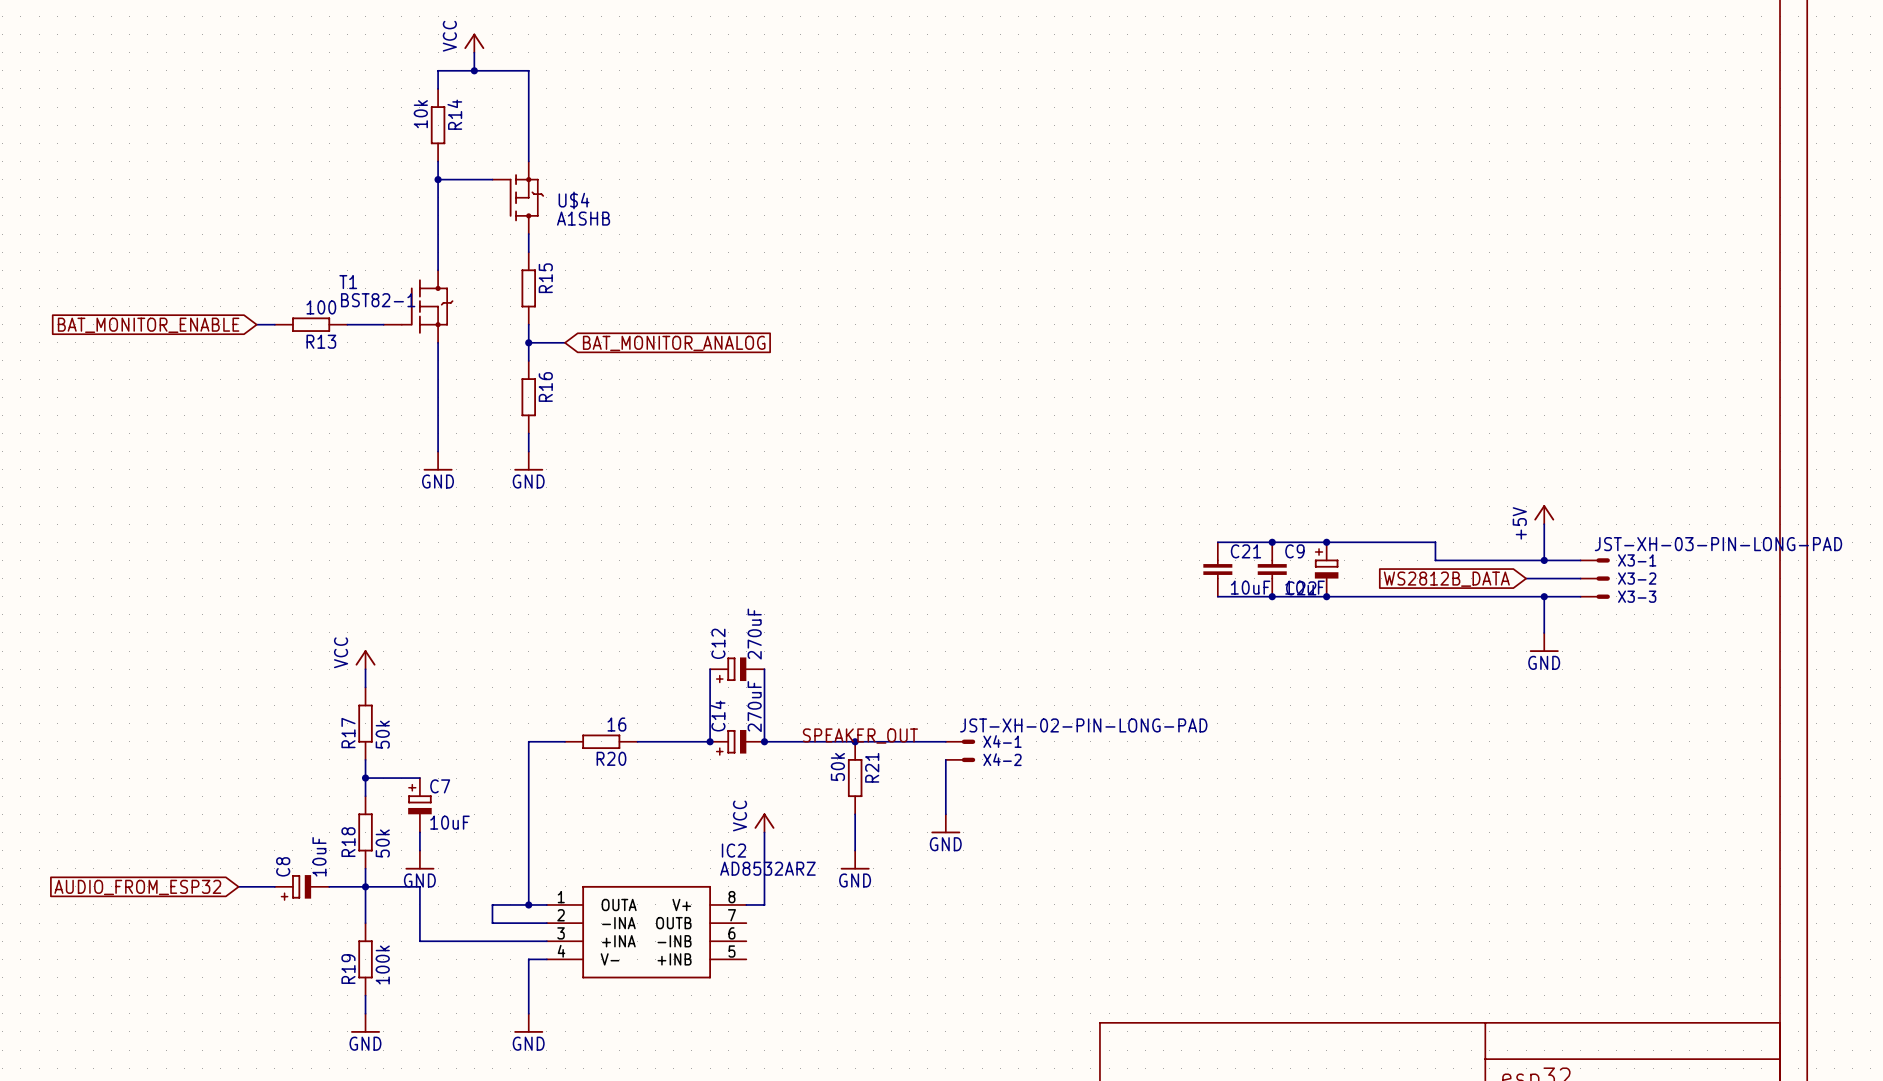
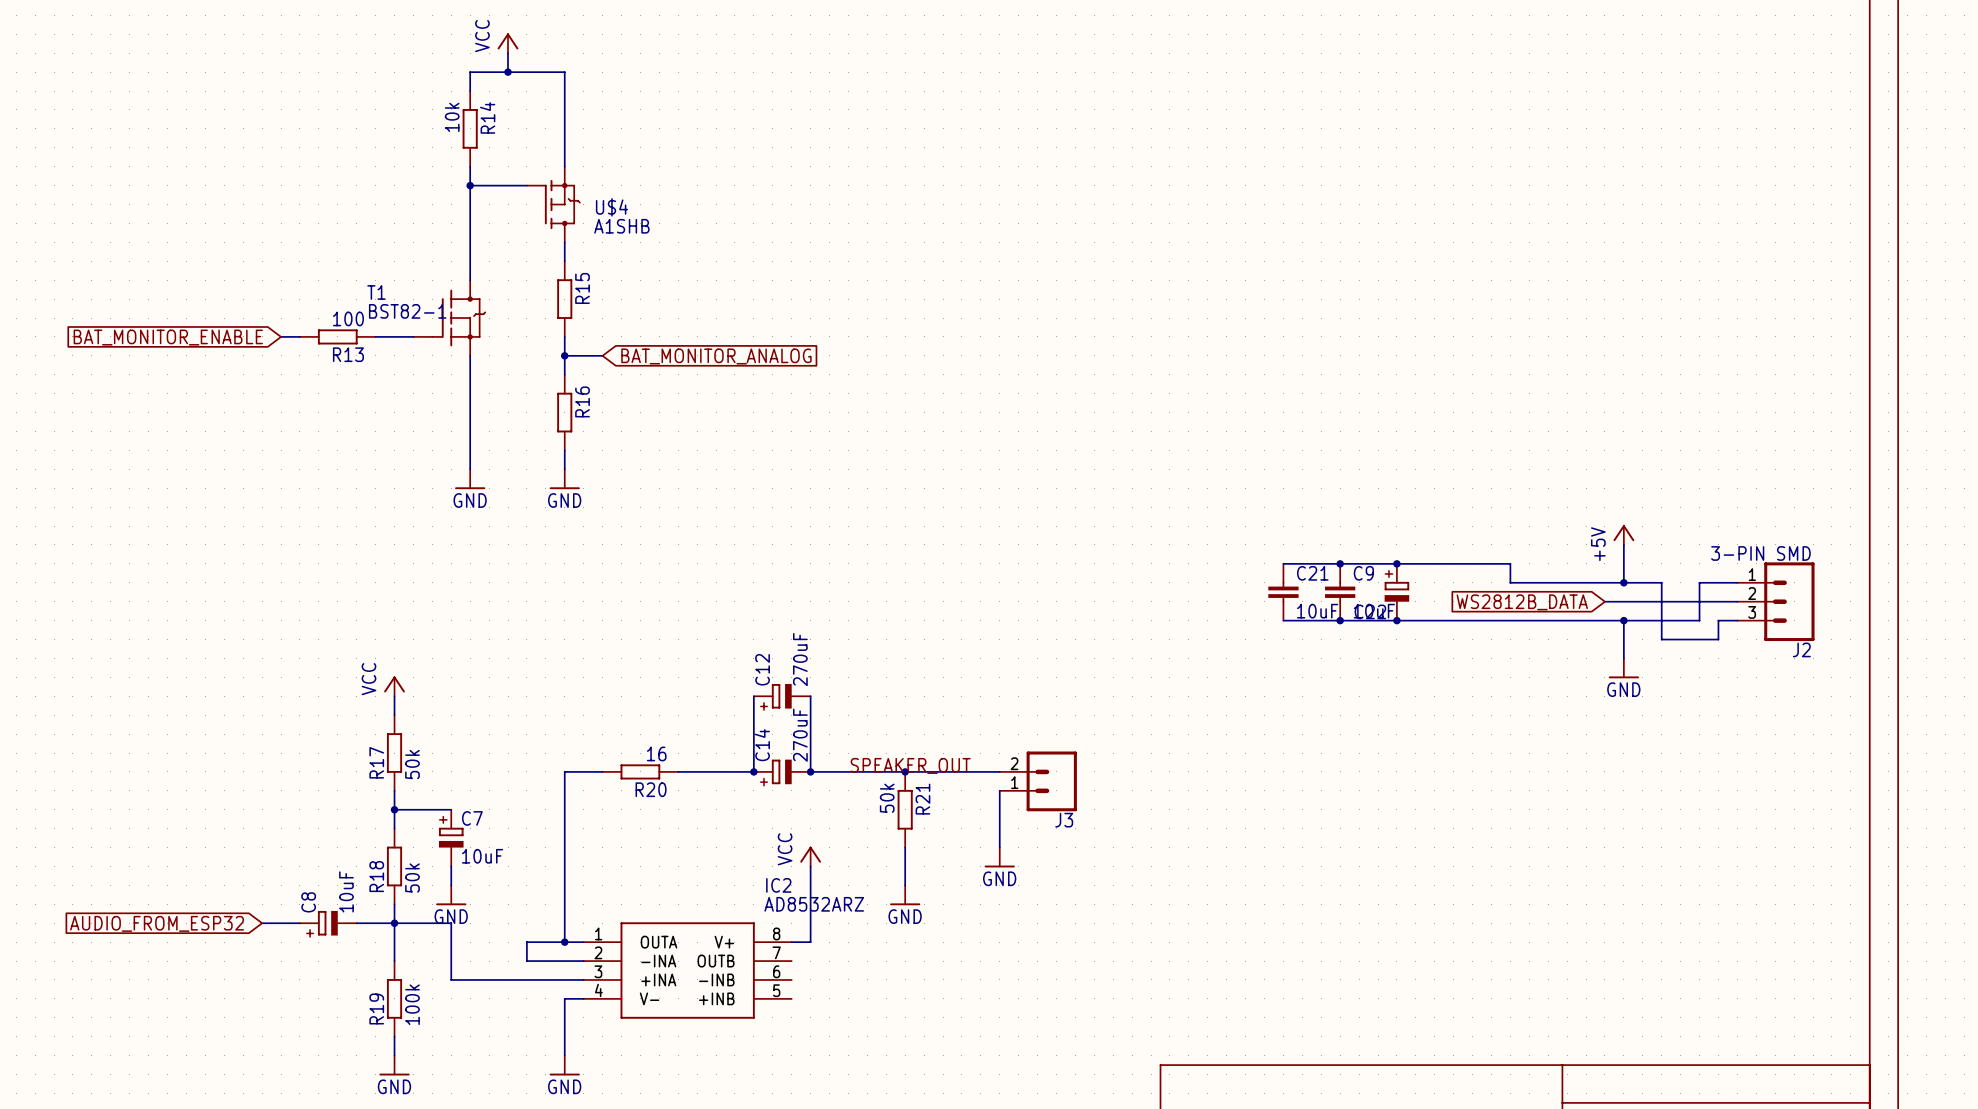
wire: none -> (1661, 582) (1661, 639) (1718, 639) (1718, 620) (1737, 620)
X3-1: JST-XH-03-PIN-LONG-PAD (1595, 560) -> none
wire: none -> (1737, 582) (1699, 582) (1699, 620) (1661, 620)
wire: none -> (1661, 601) (1737, 601)
X3-2: (1595, 578) -> none
J2: none -> 3-PIN SMD (1775, 601)
X3-3: (1595, 596) -> none
X4-1: JST-XH-02-PIN-LONG-PAD (960, 741) -> none
J3: none -> (1038, 781)
X4-2: (960, 759) -> none

